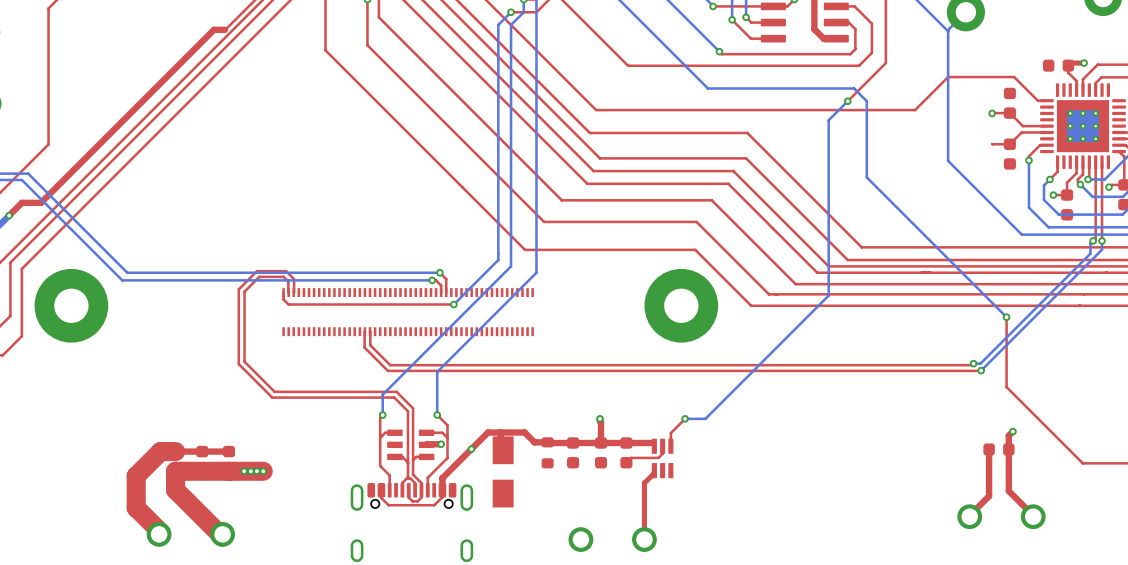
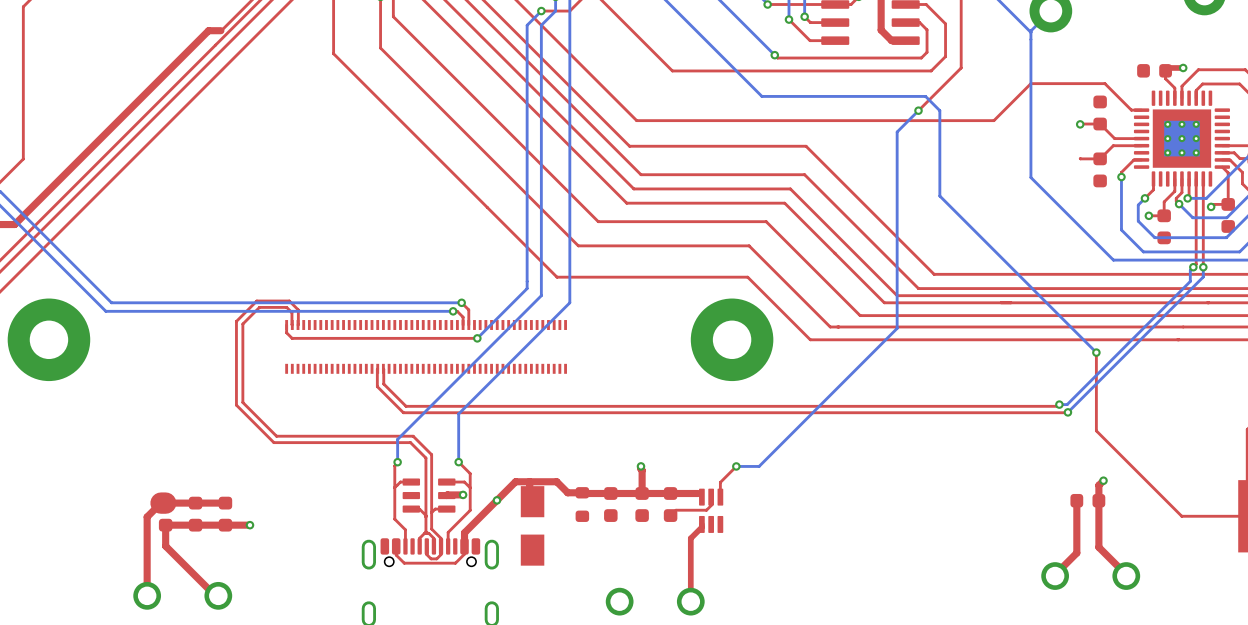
top track: (171, 451) (160, 451) (136, 476) (136, 507) (159, 530) -> (161, 503) (147, 516) (147, 591)
top track width: thick (244, 471) (175, 471) (175, 490) (222, 537) -> thin (242, 525) (165, 525) (165, 546) (218, 598)
via: (244, 471) -> none
via: (256, 471) -> none
top track: (263, 471) (244, 471) -> none
via: (263, 471) -> none

